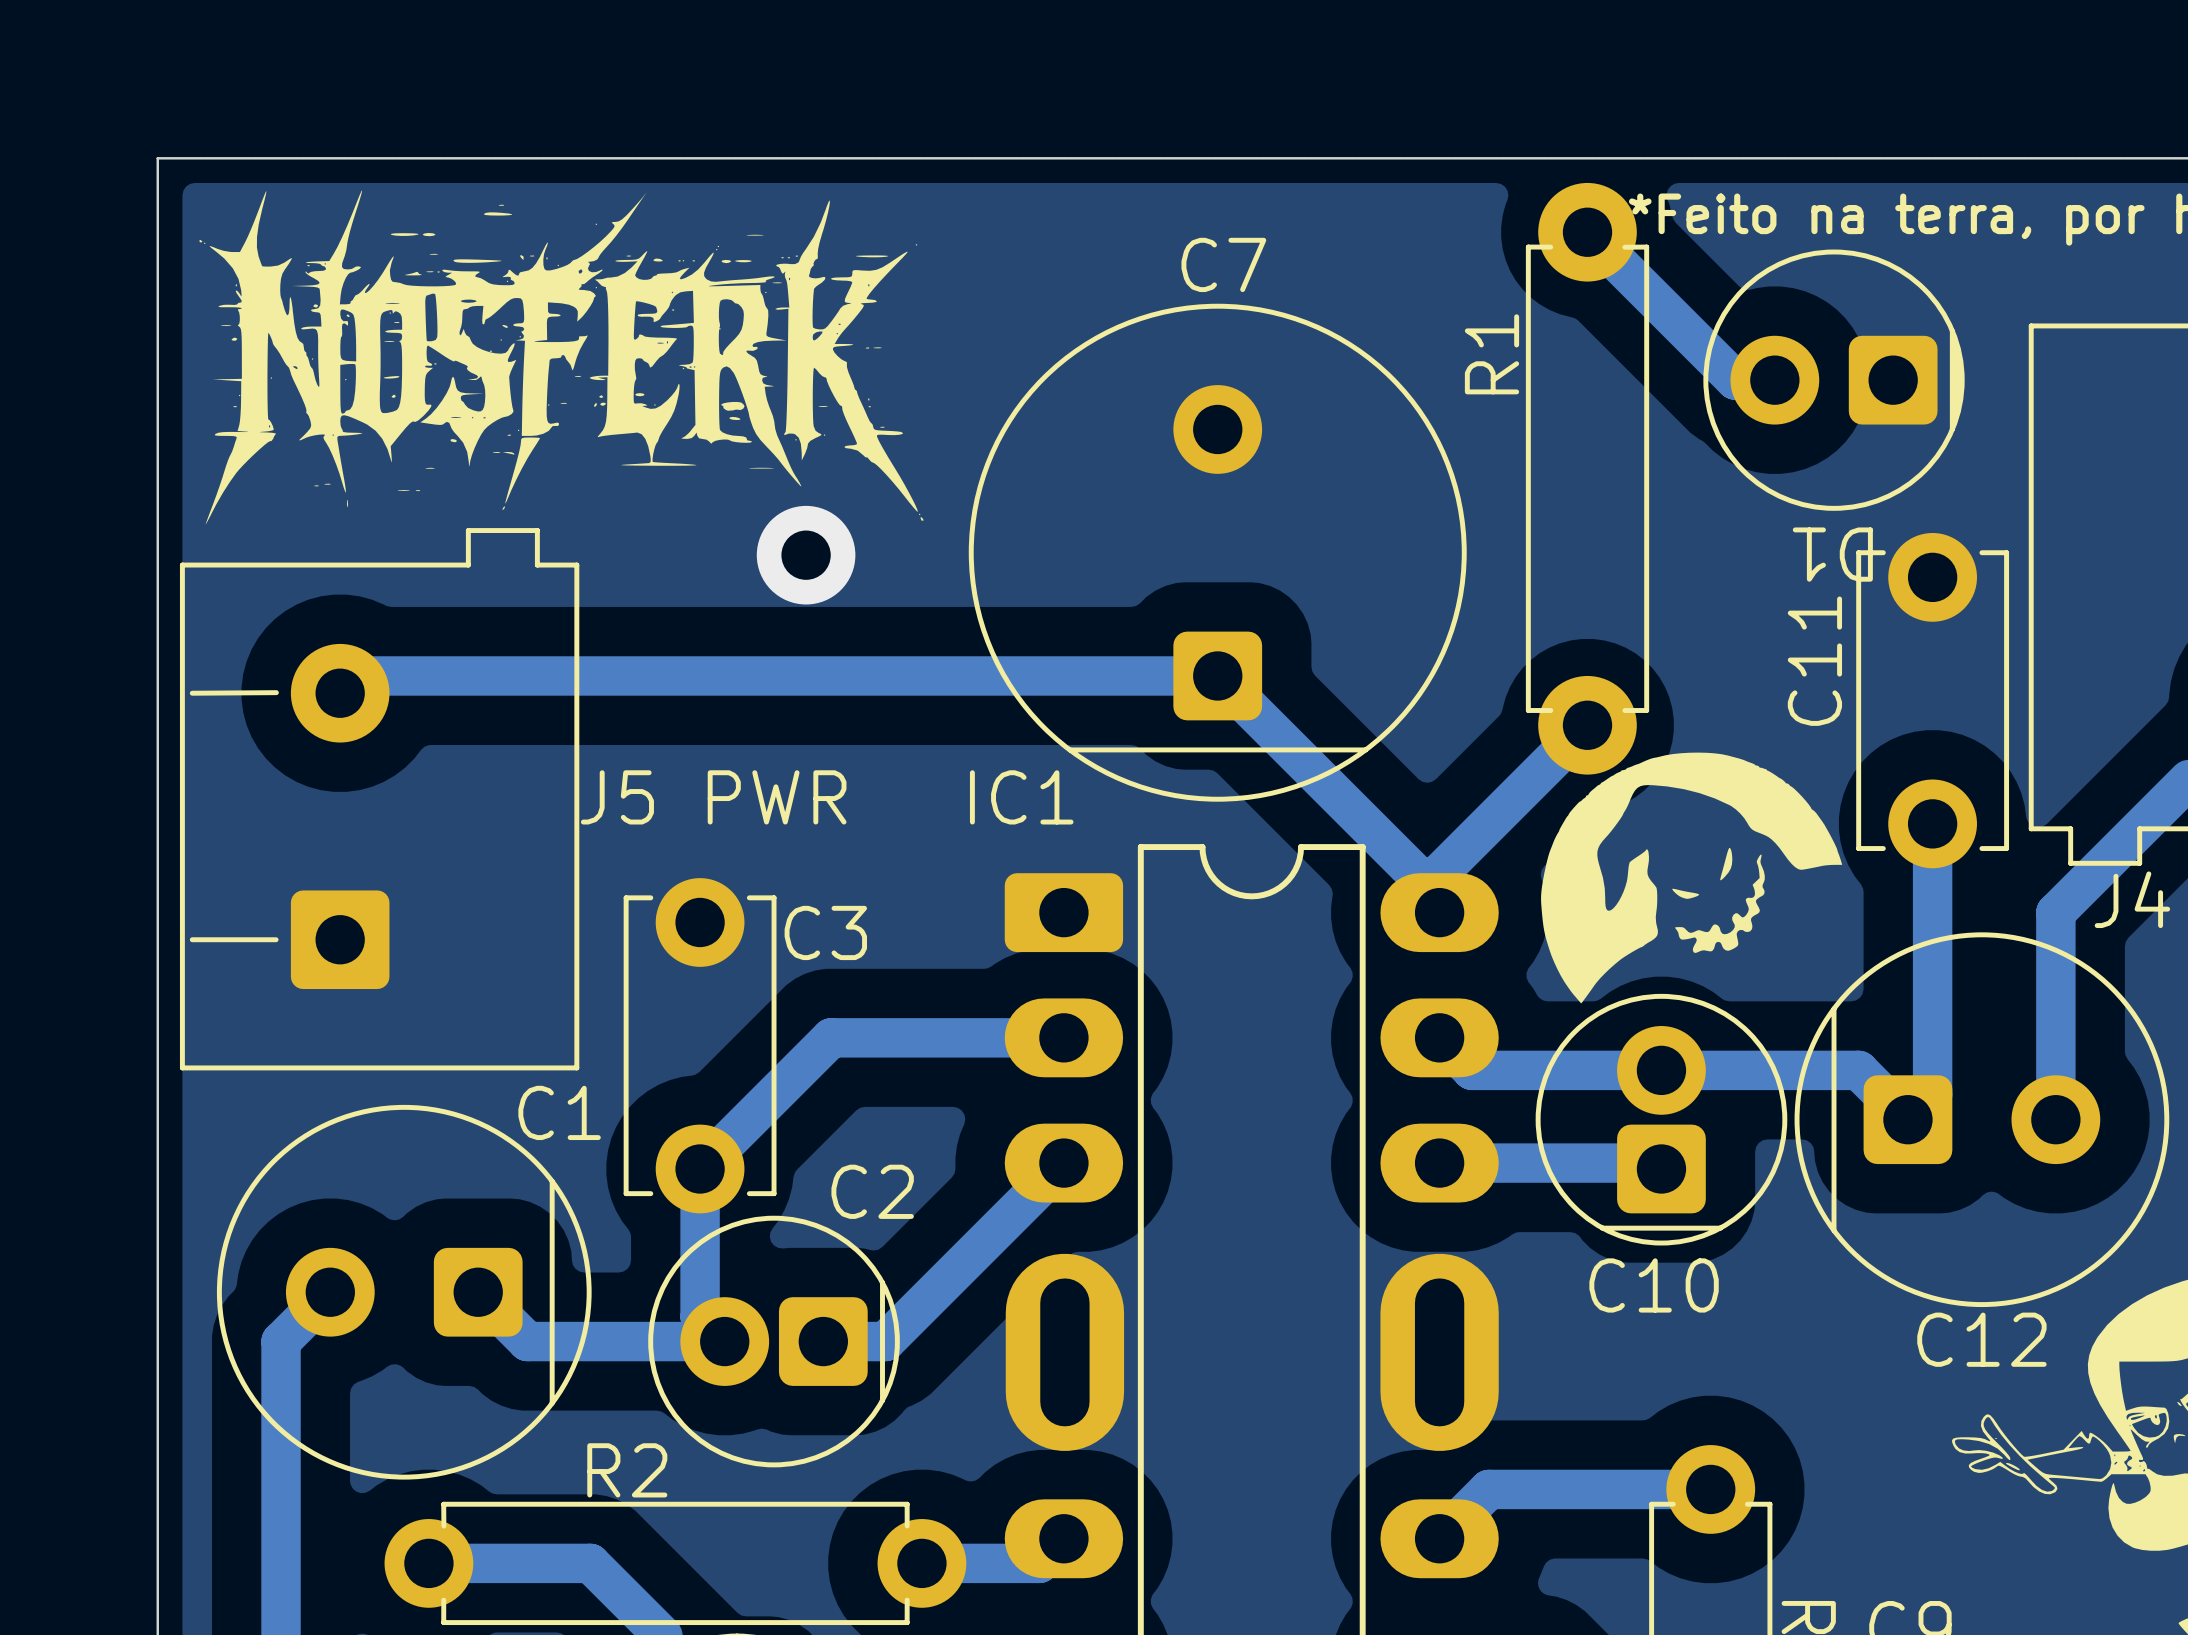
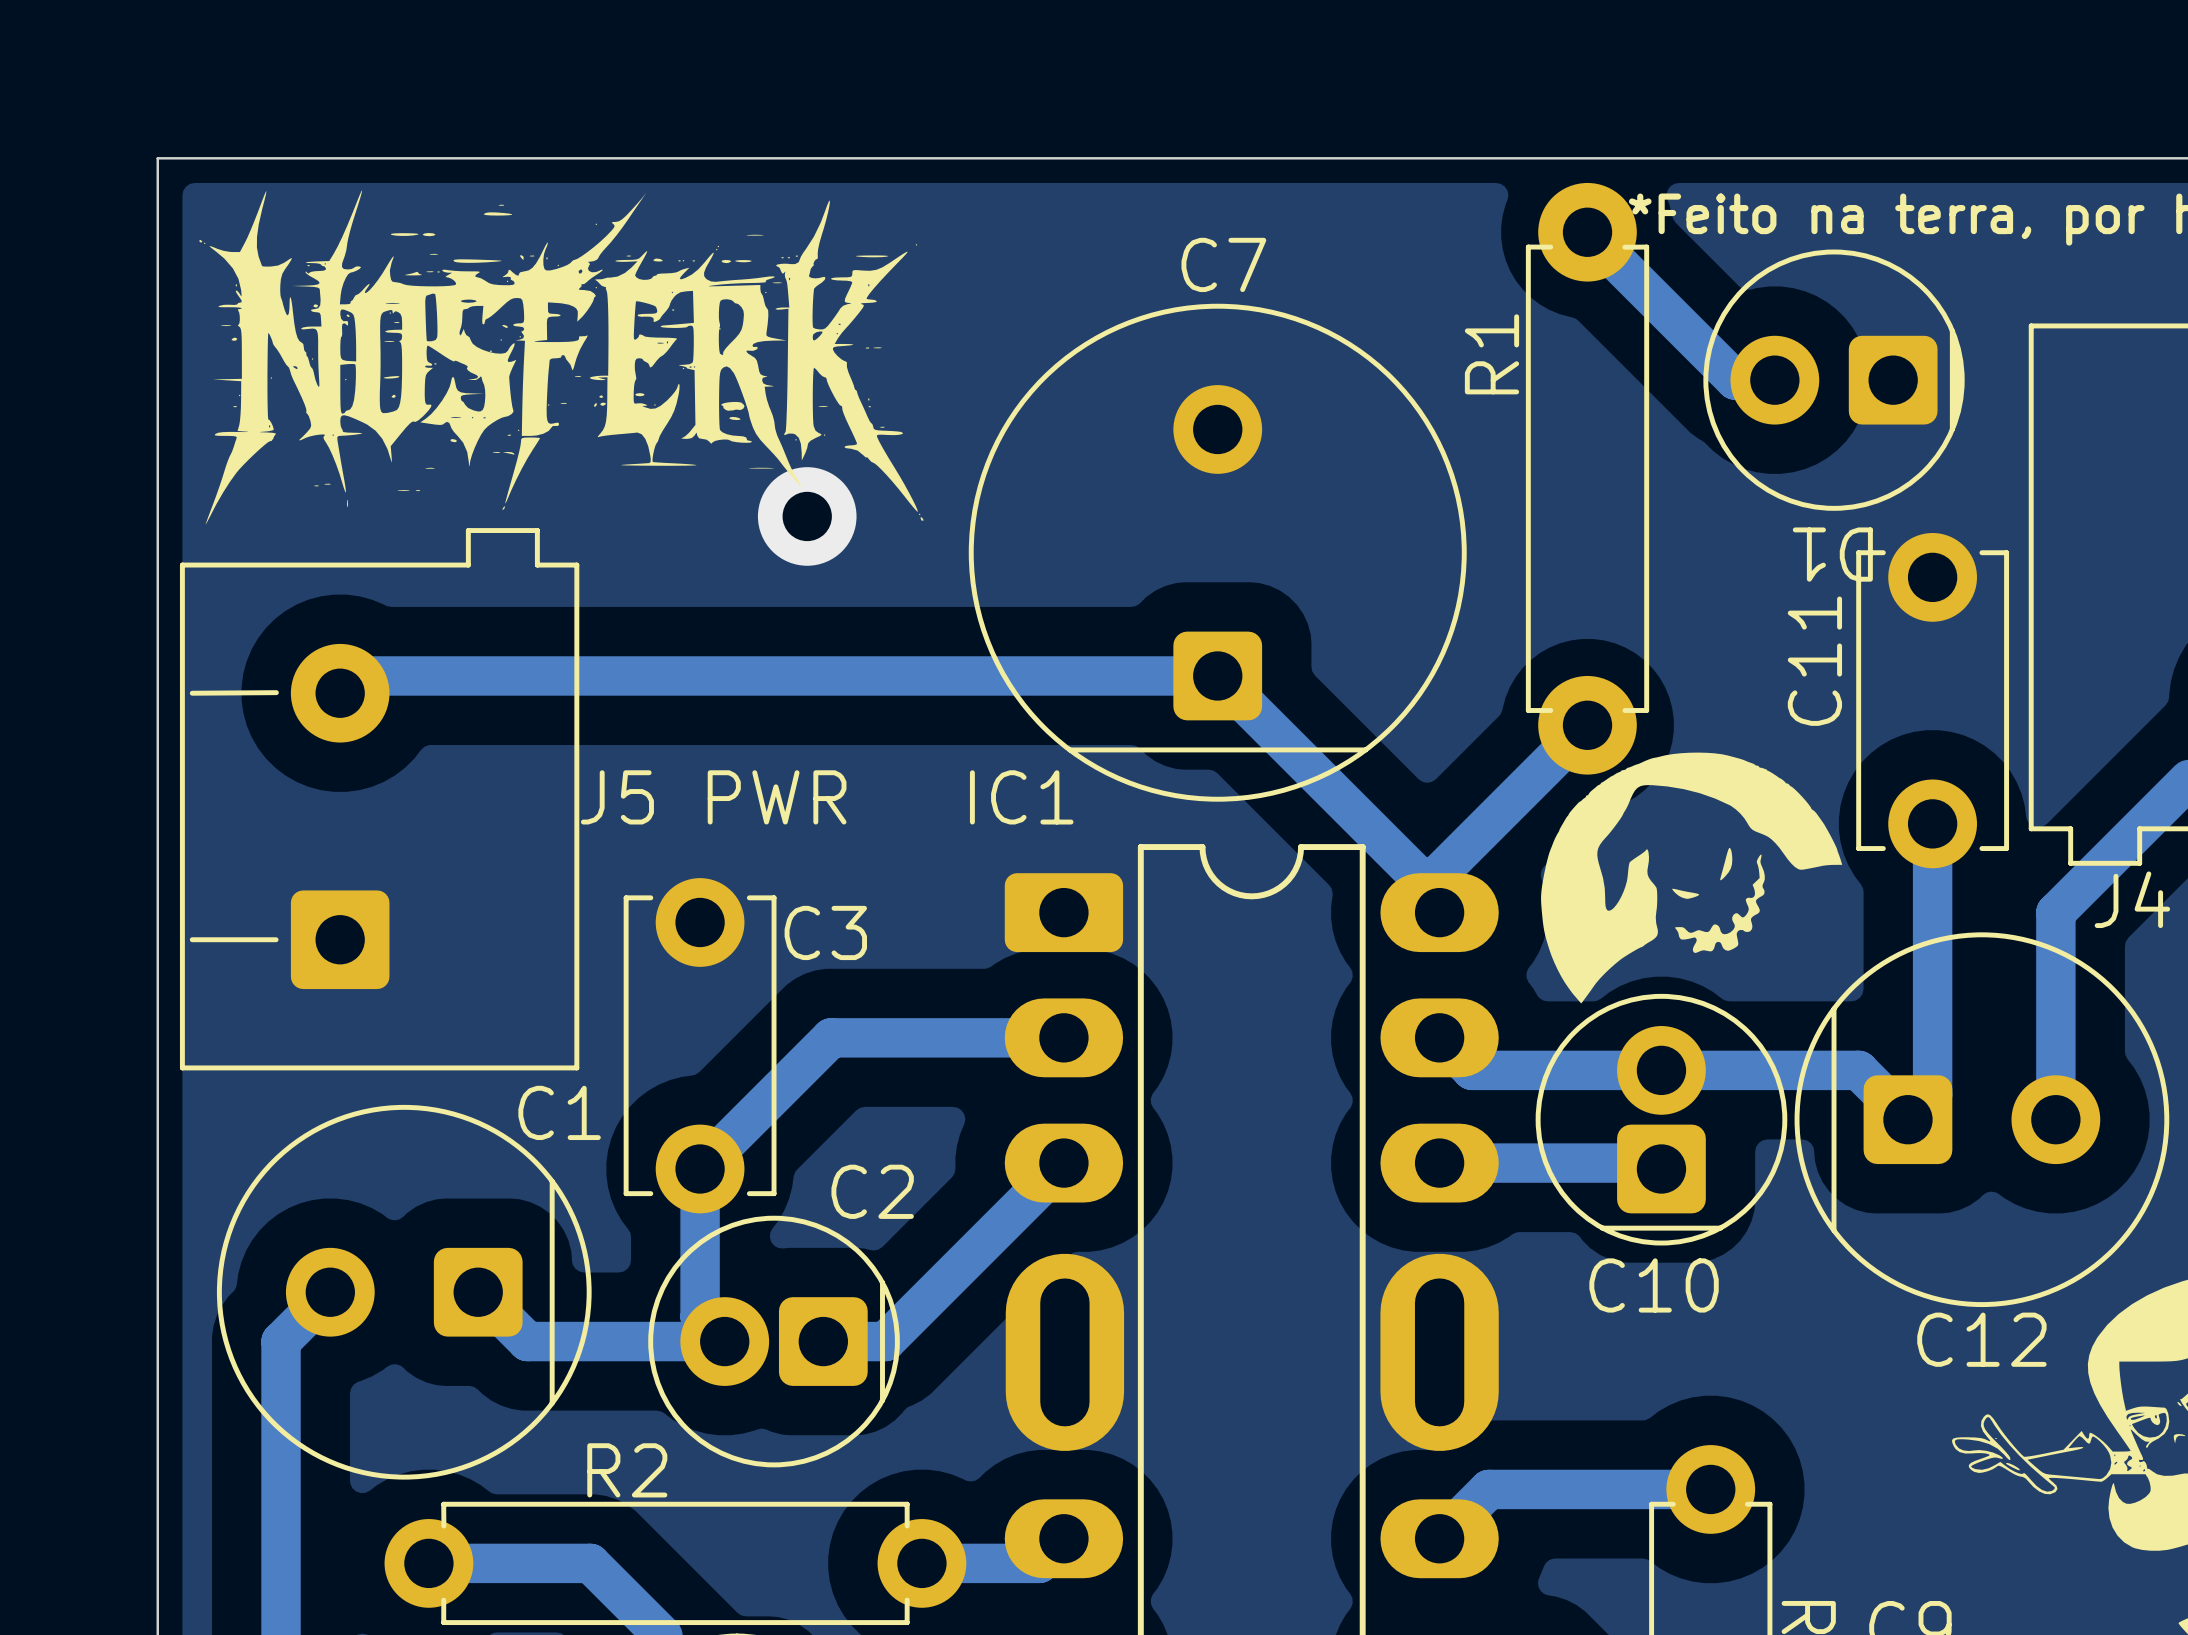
via position: (806, 555) -> (807, 516)

